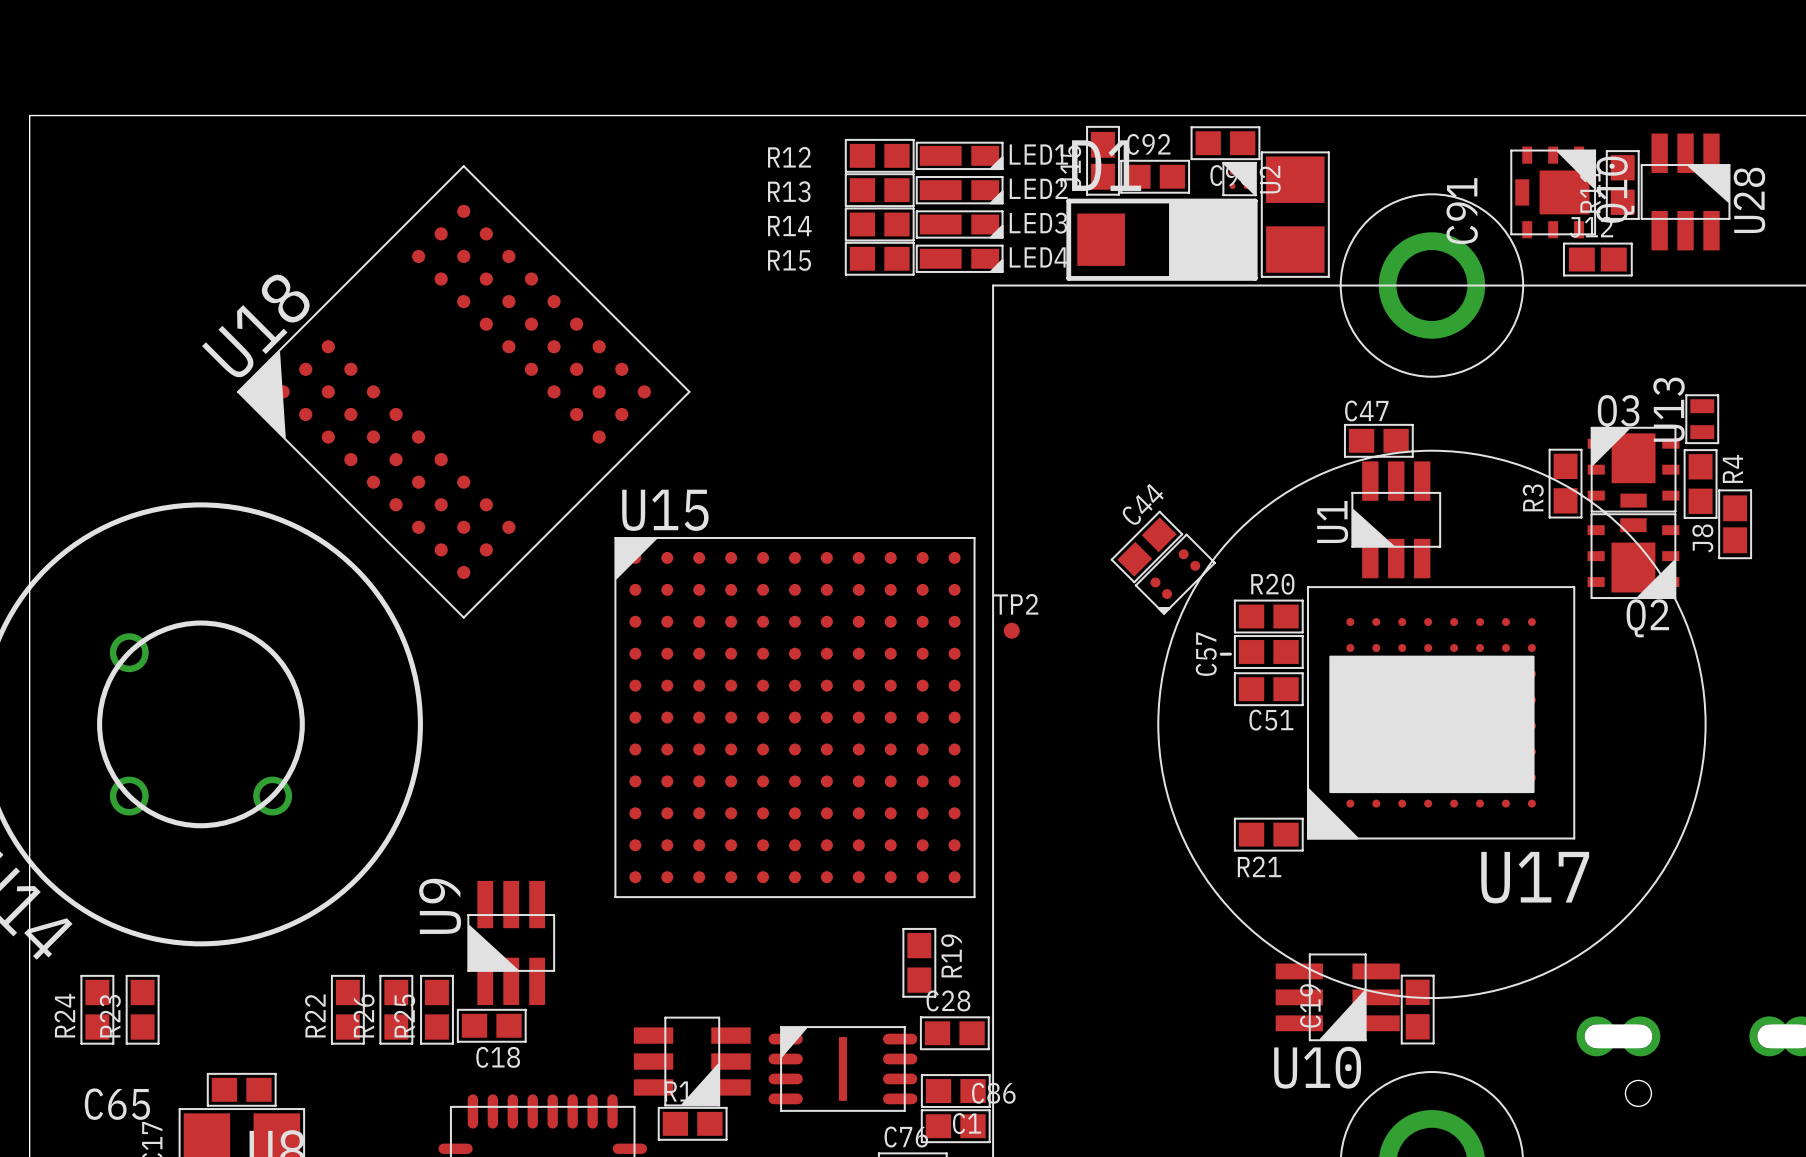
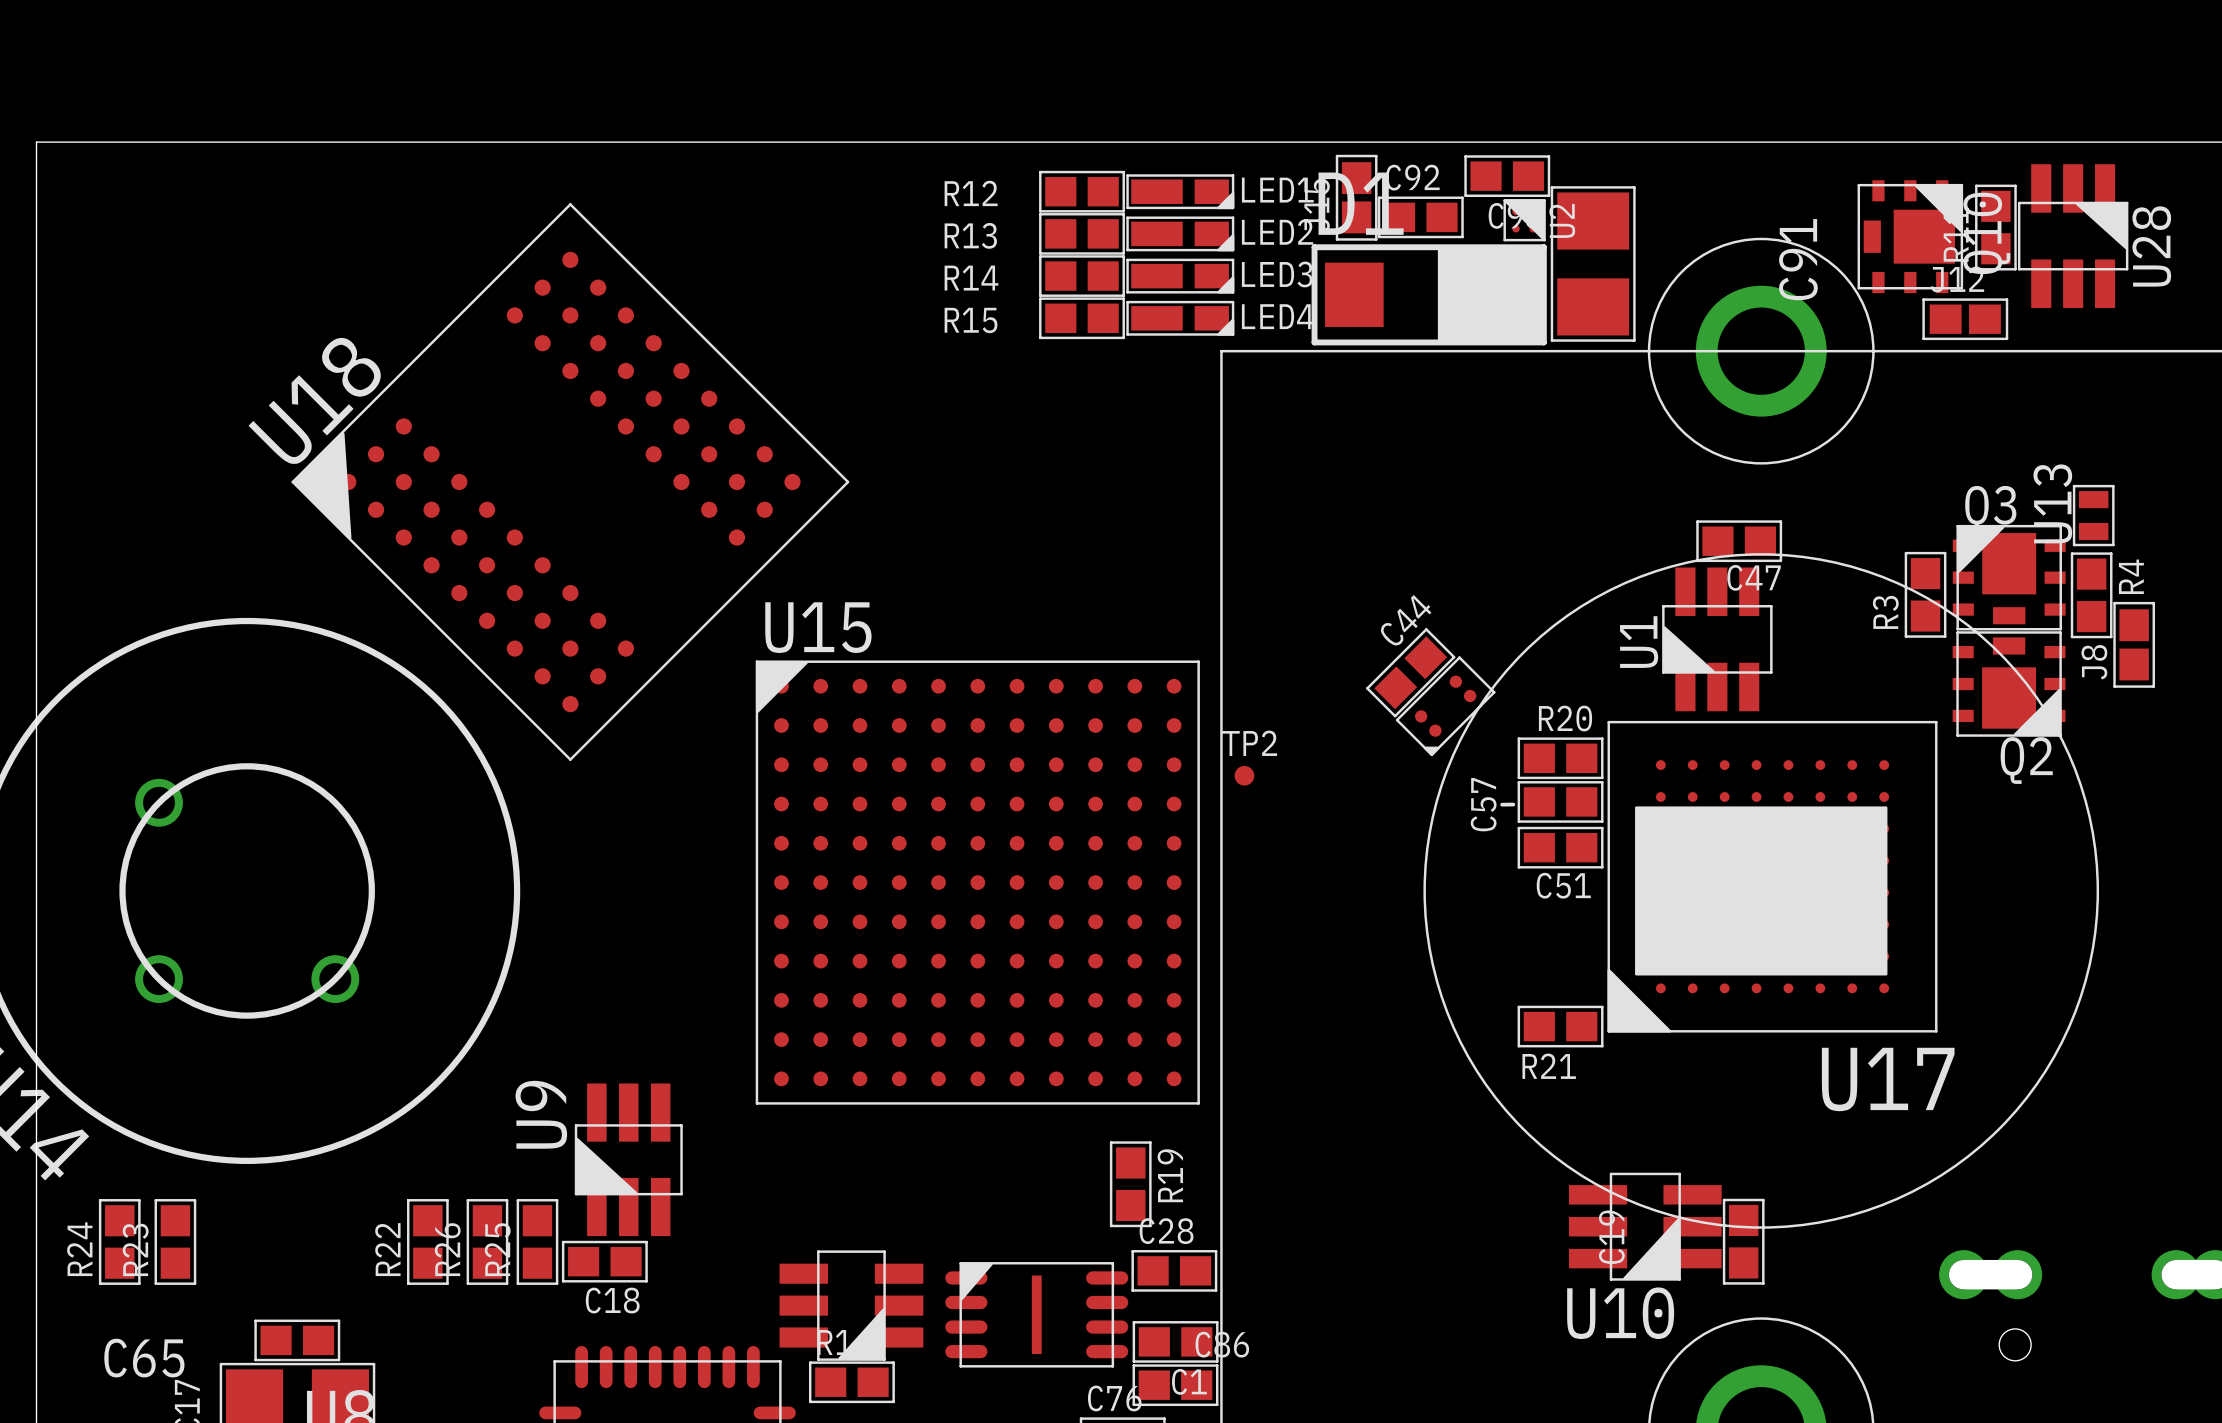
C47 name position: C47 (1366, 411) -> C47 (1754, 577)
C47 position: (1378, 440) -> (1739, 541)

